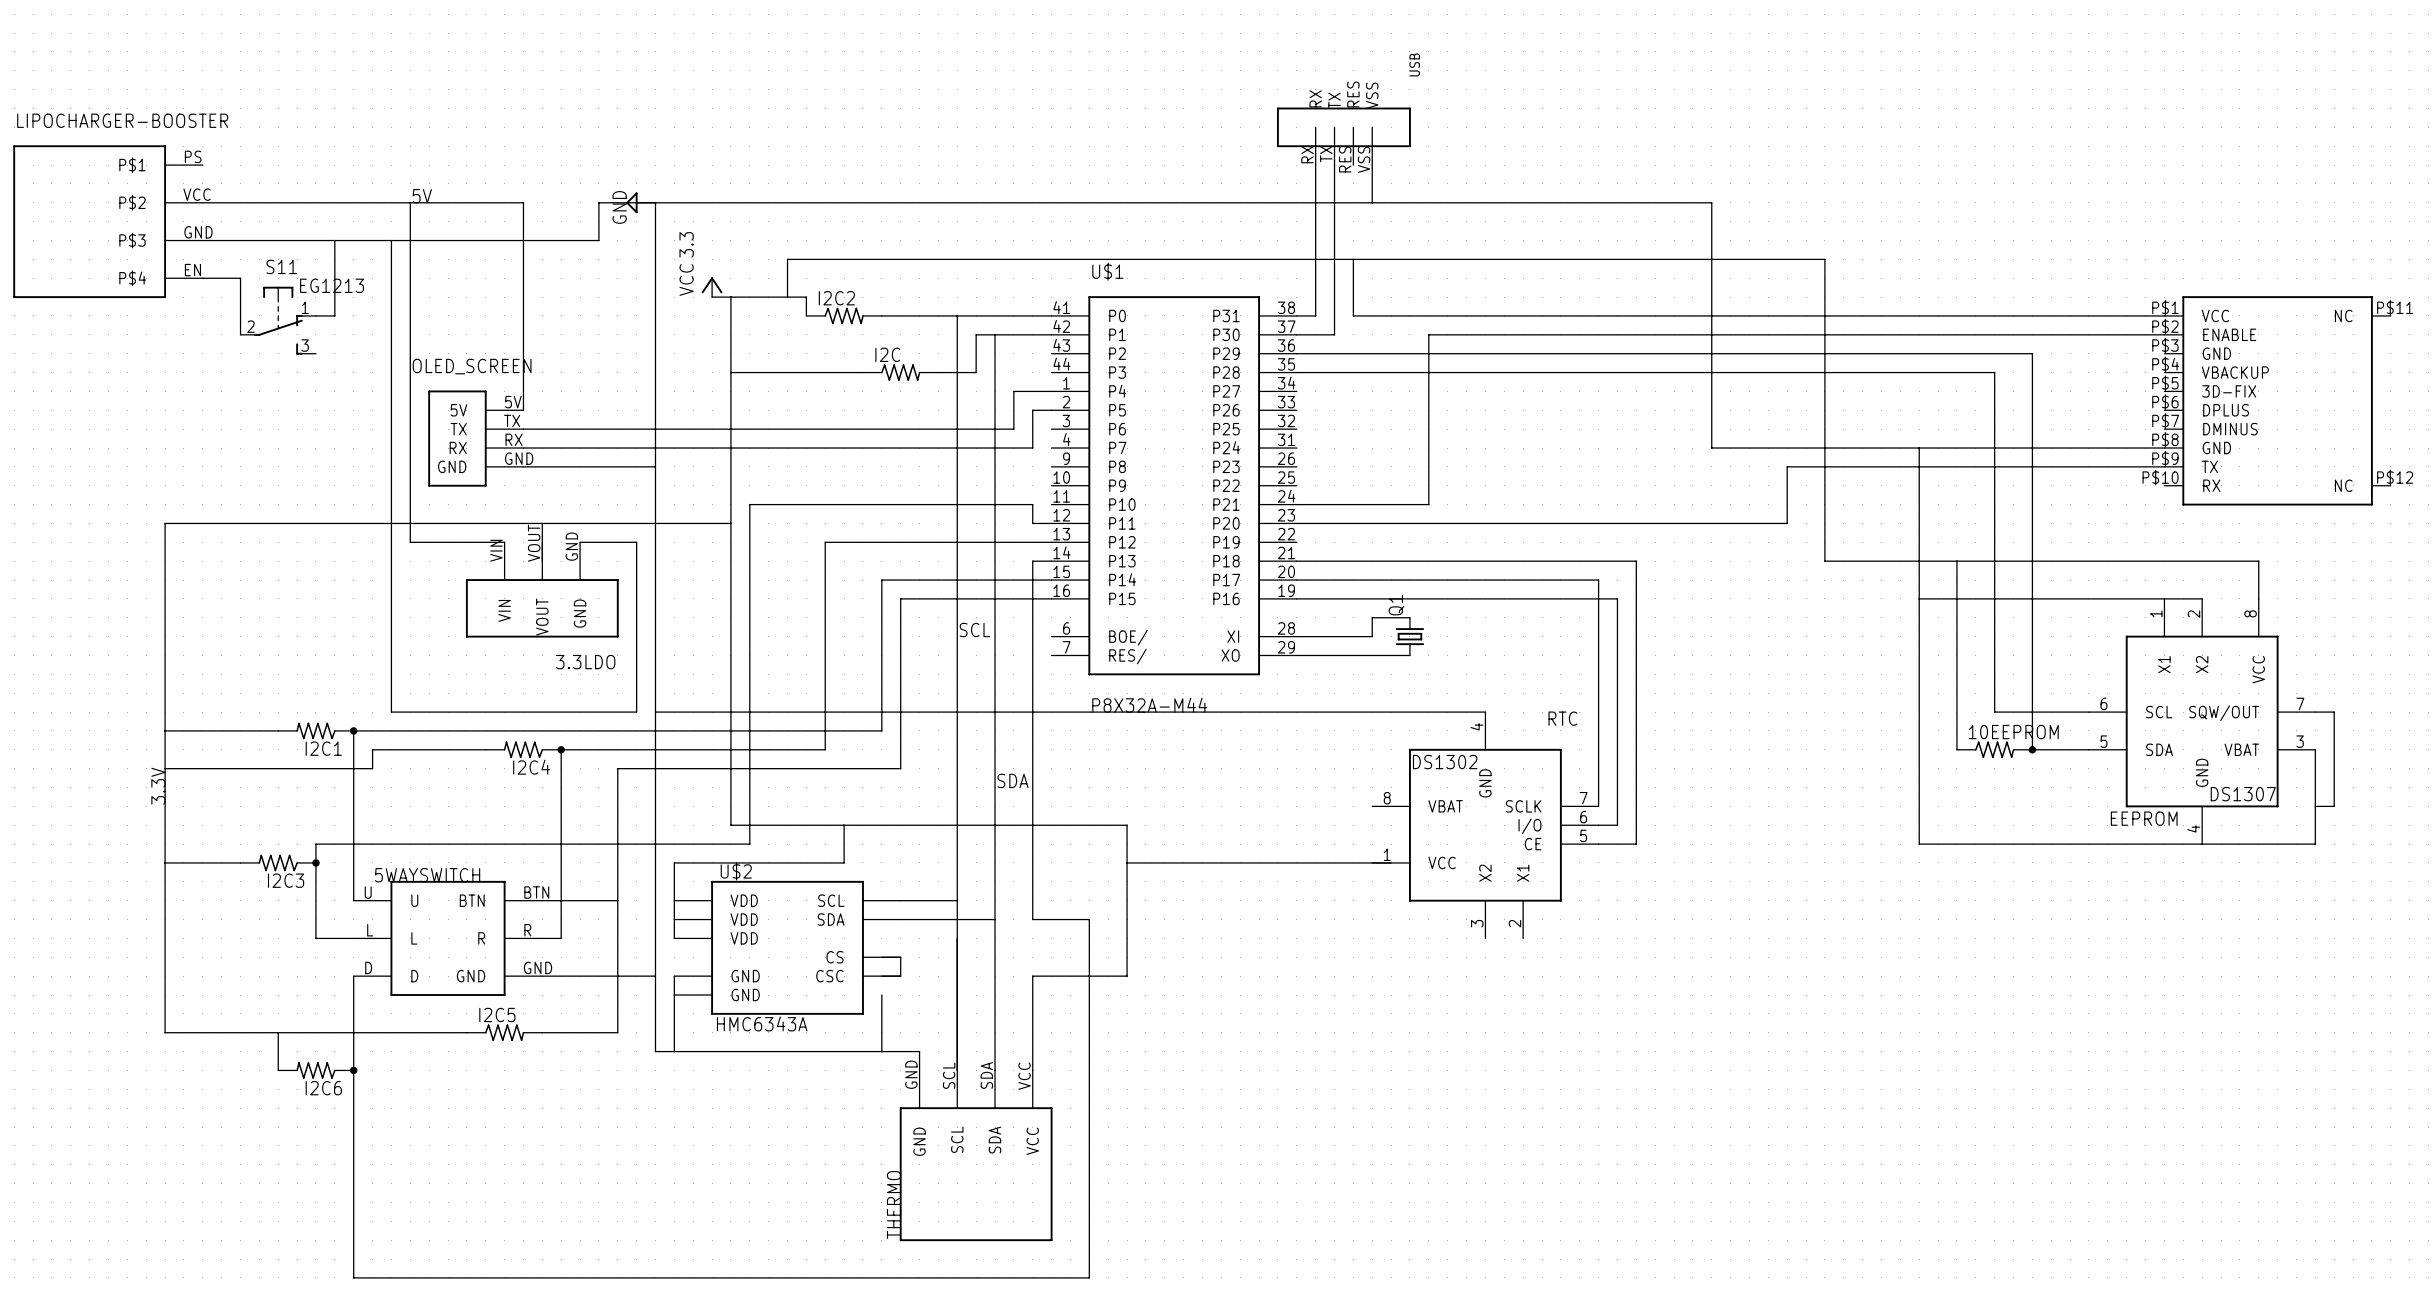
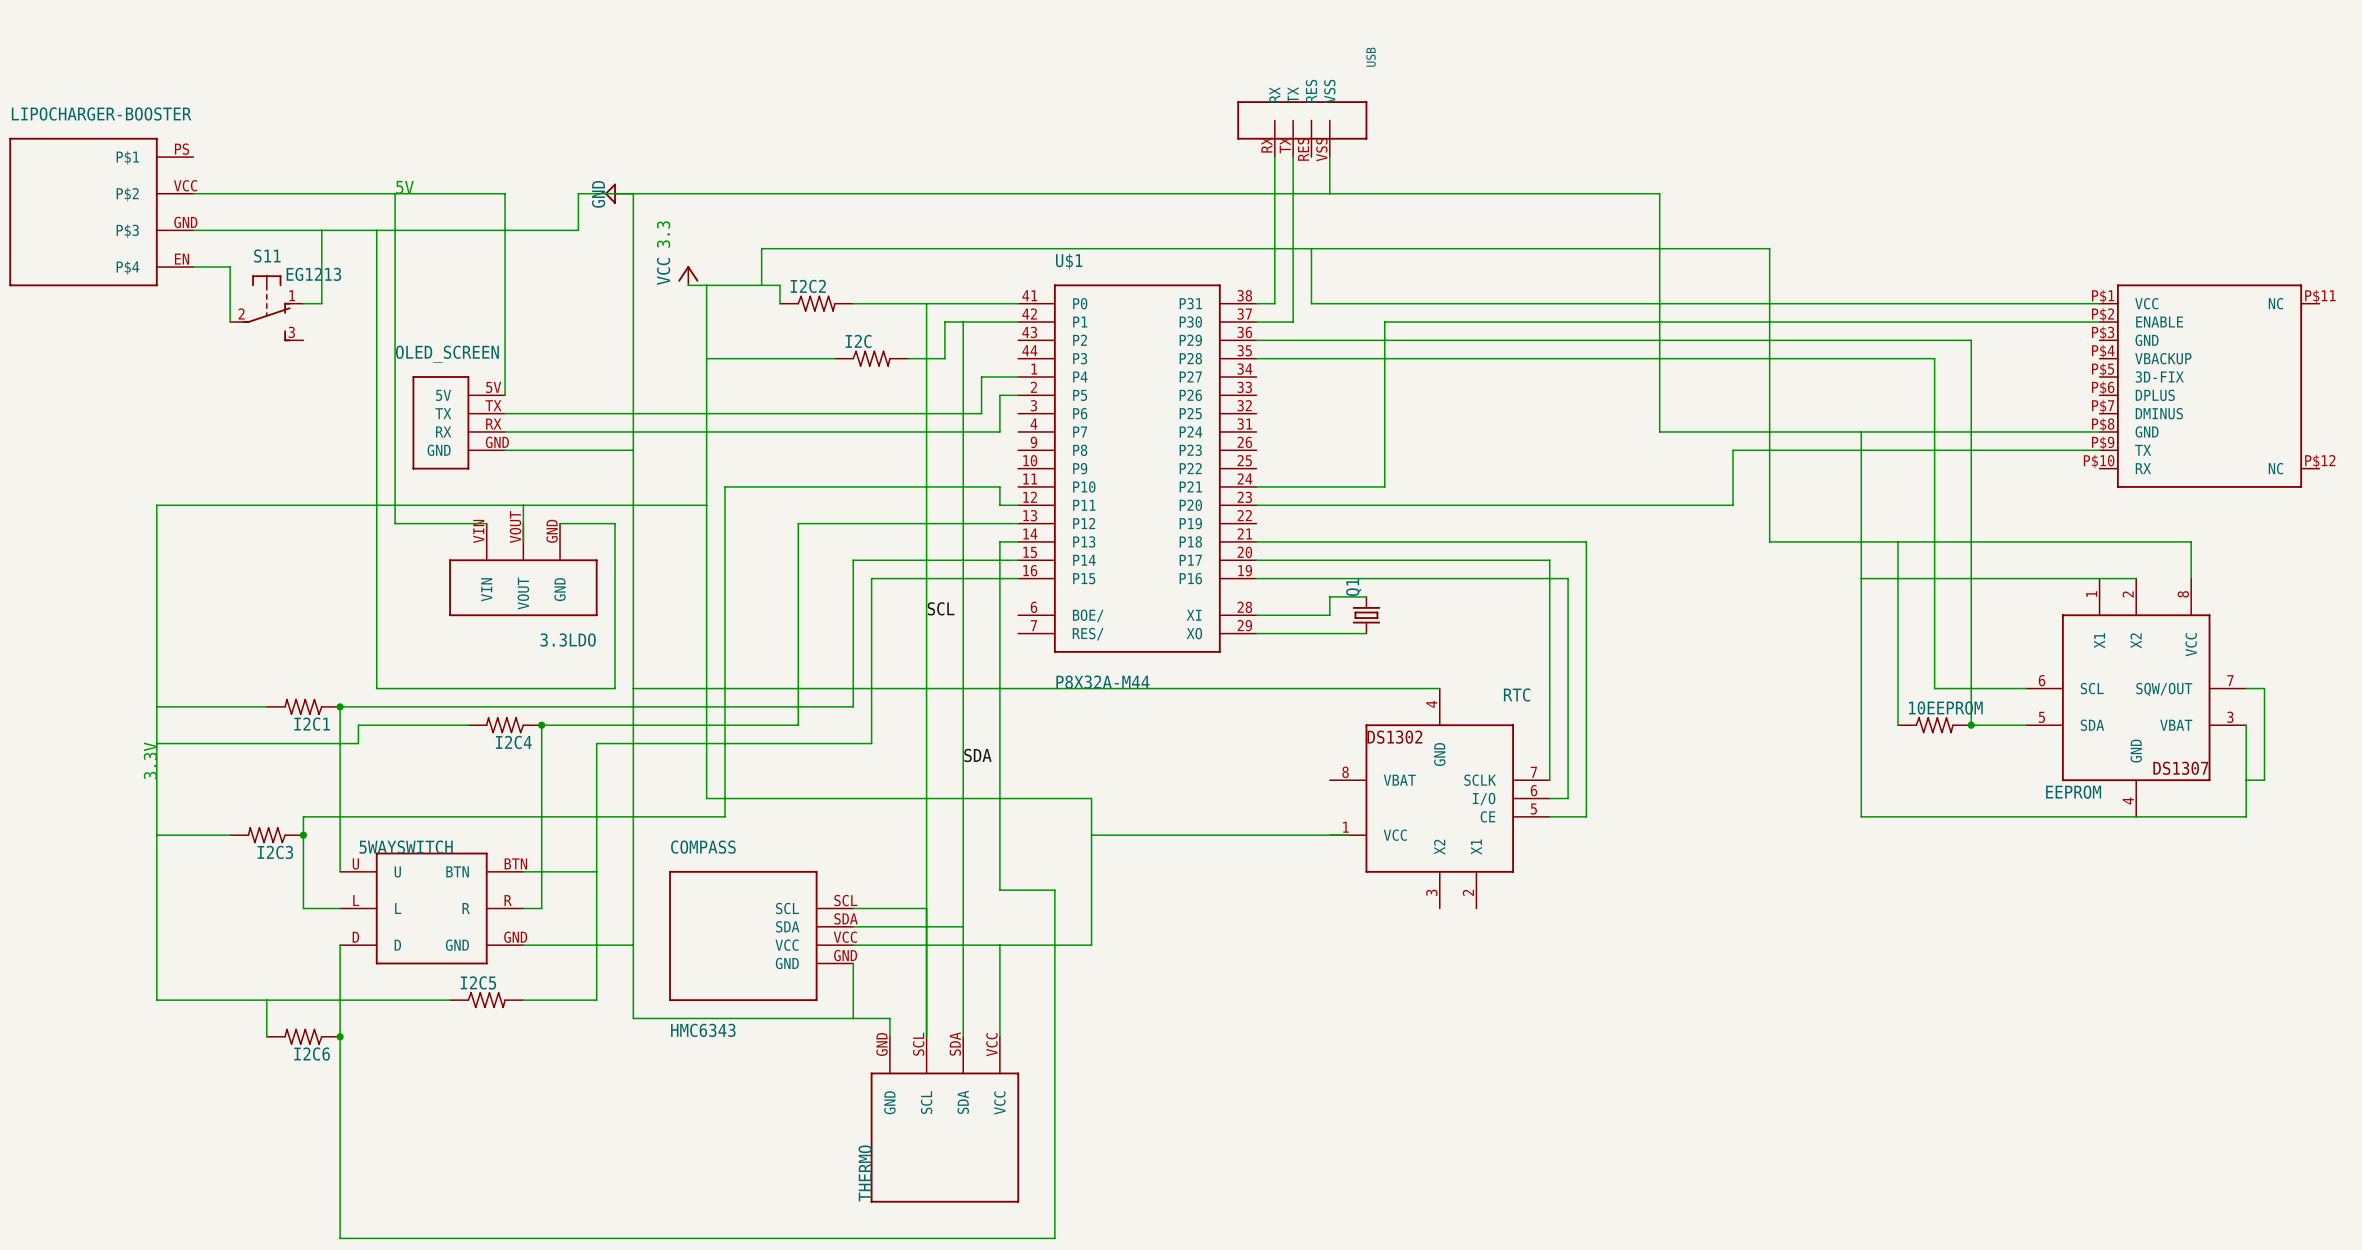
wire: (844, 825) (844, 862) (674, 862) (674, 938) -> none
wire: (900, 900) (957, 900) -> none
wire: (900, 919) (995, 919) -> none
wire: none -> (853, 908) (926, 908)
U$2: HMC6343A (787, 947) -> none
wire: (900, 957) (900, 976) -> (871, 926) (963, 926)
COMPASS: none -> HMC6343 (761, 935)
wire: (674, 976) (674, 1051) -> none
wire: none -> (871, 945) (999, 945)

